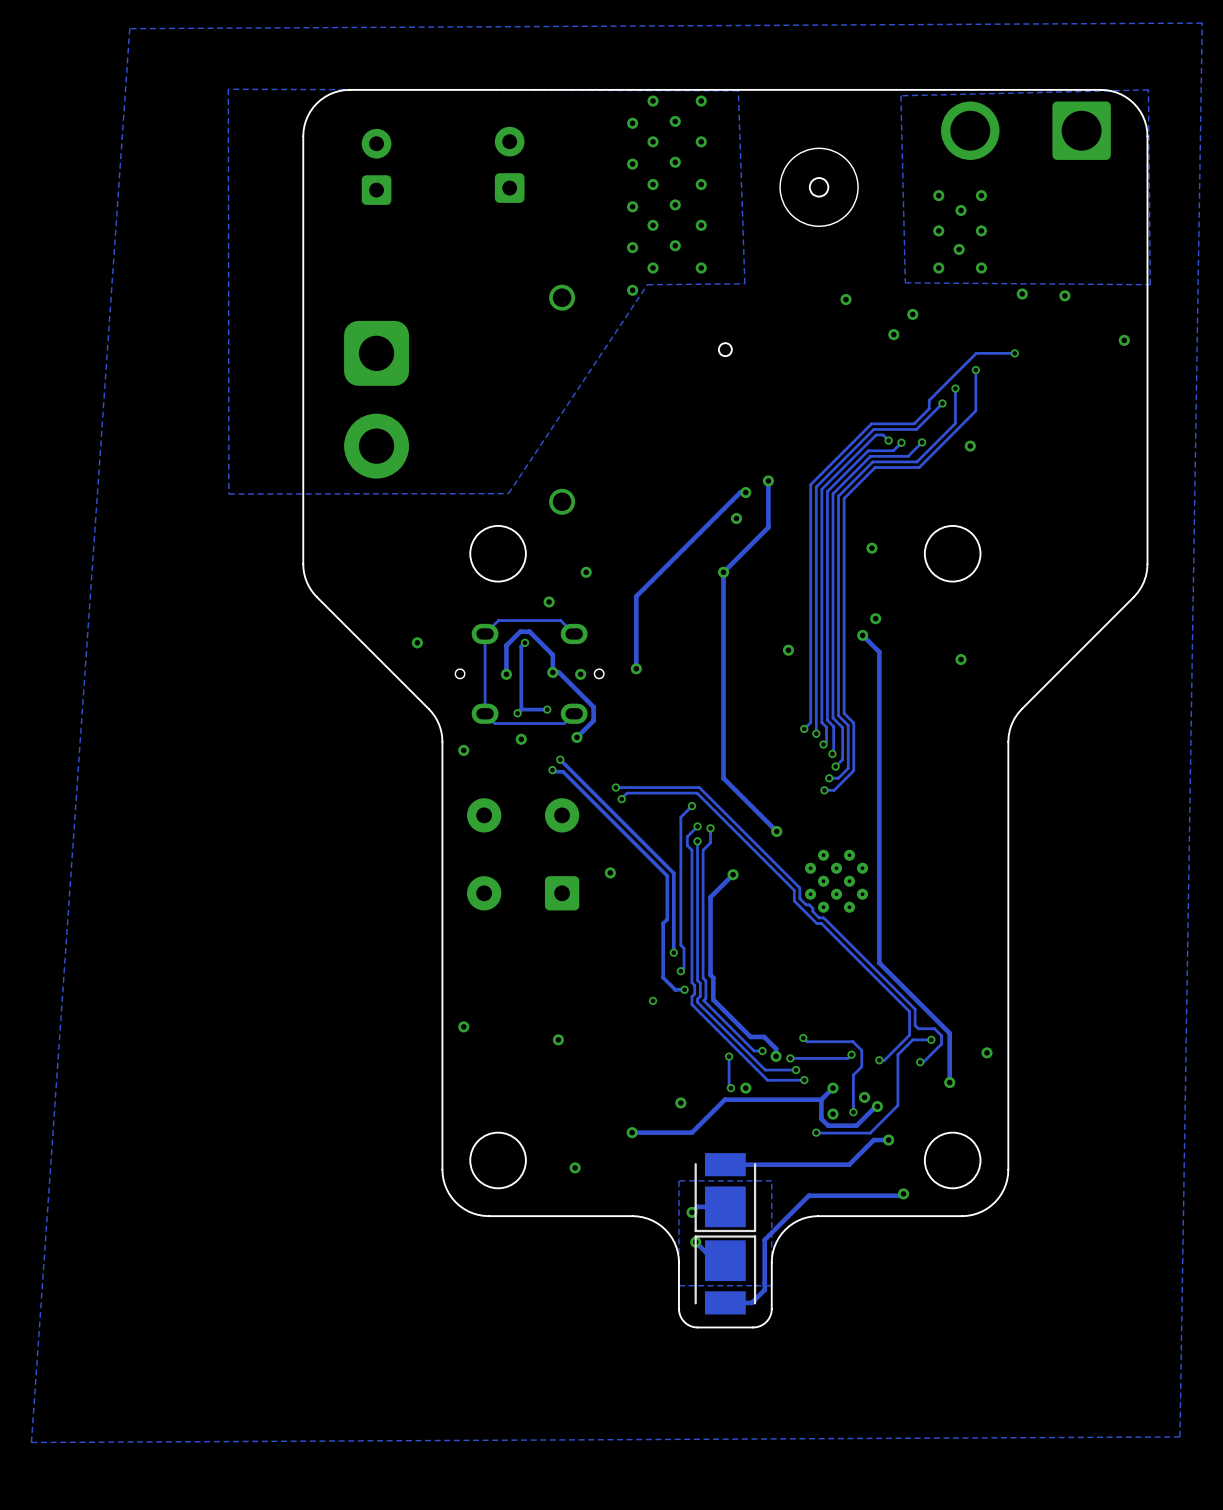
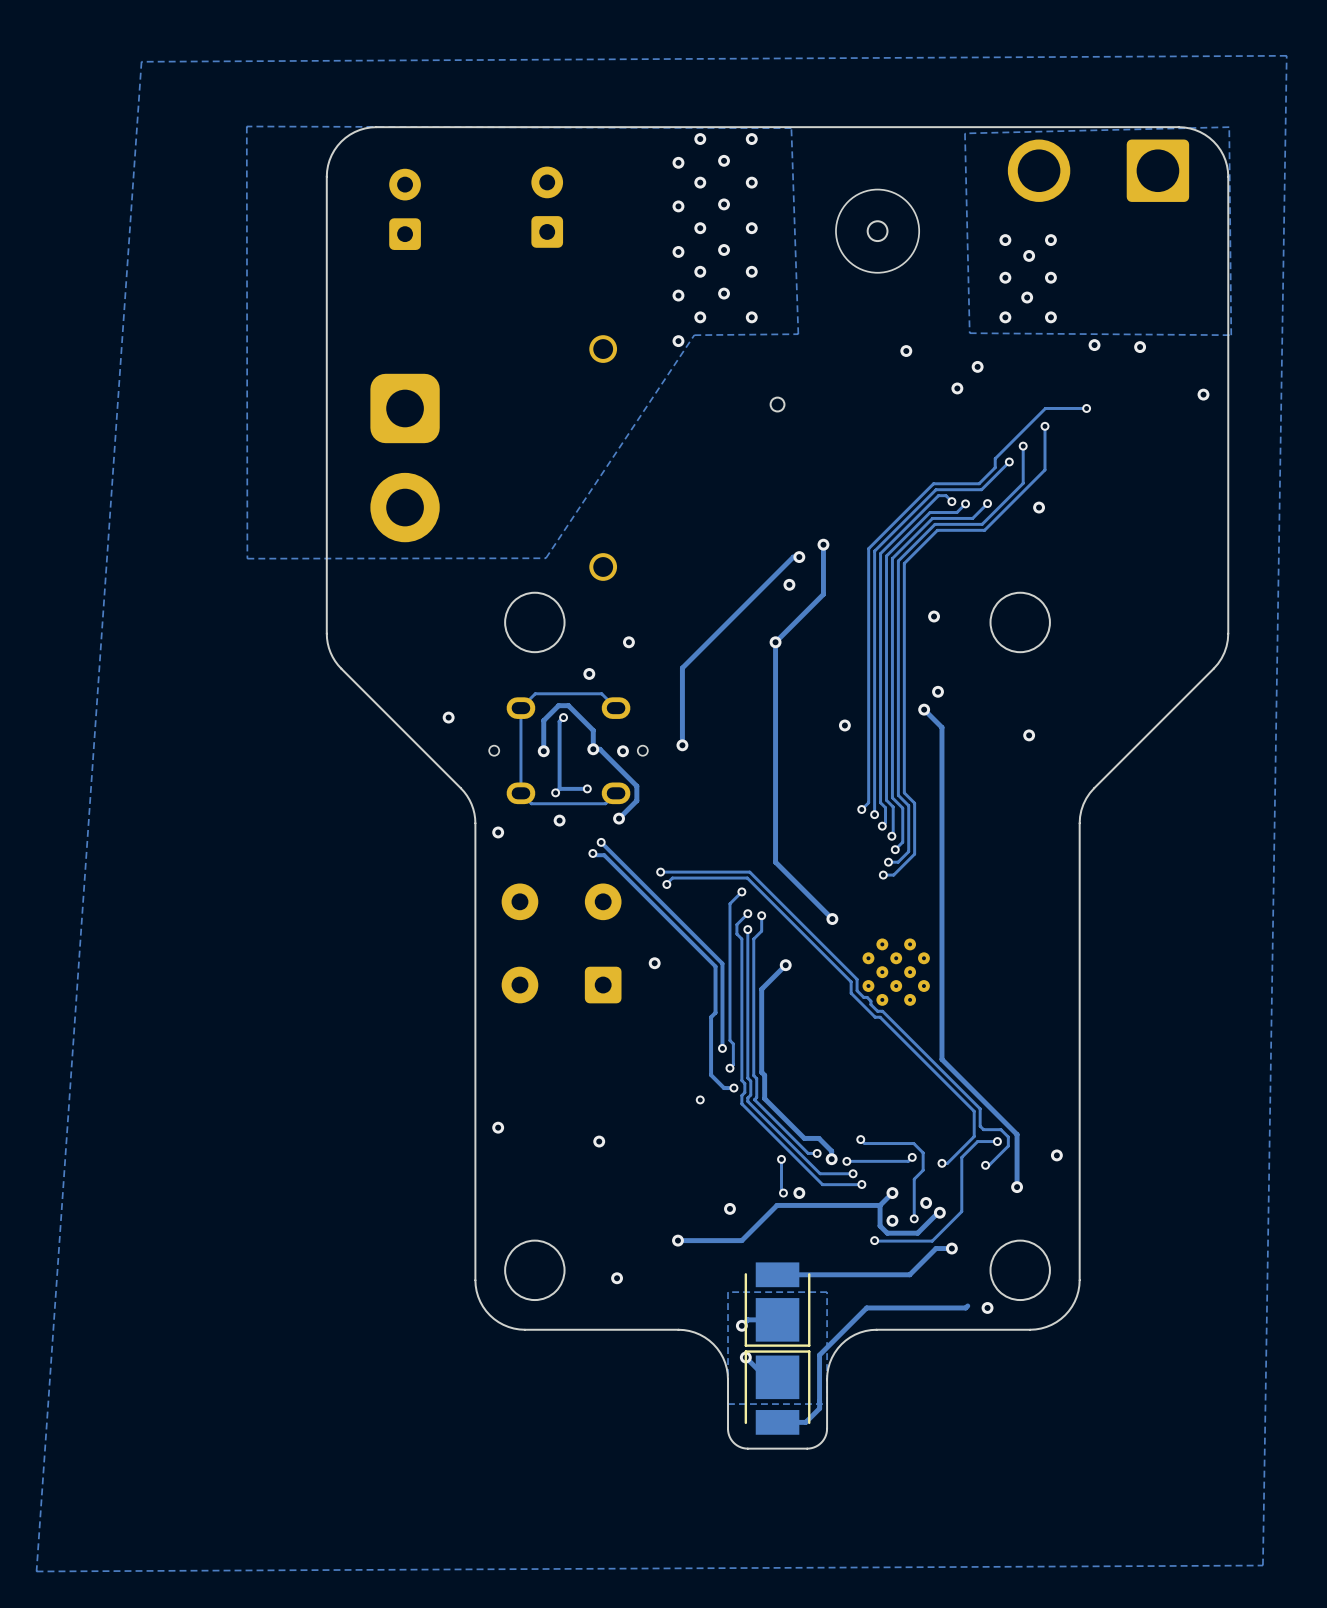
via position: (903, 1193) -> (987, 1307)

